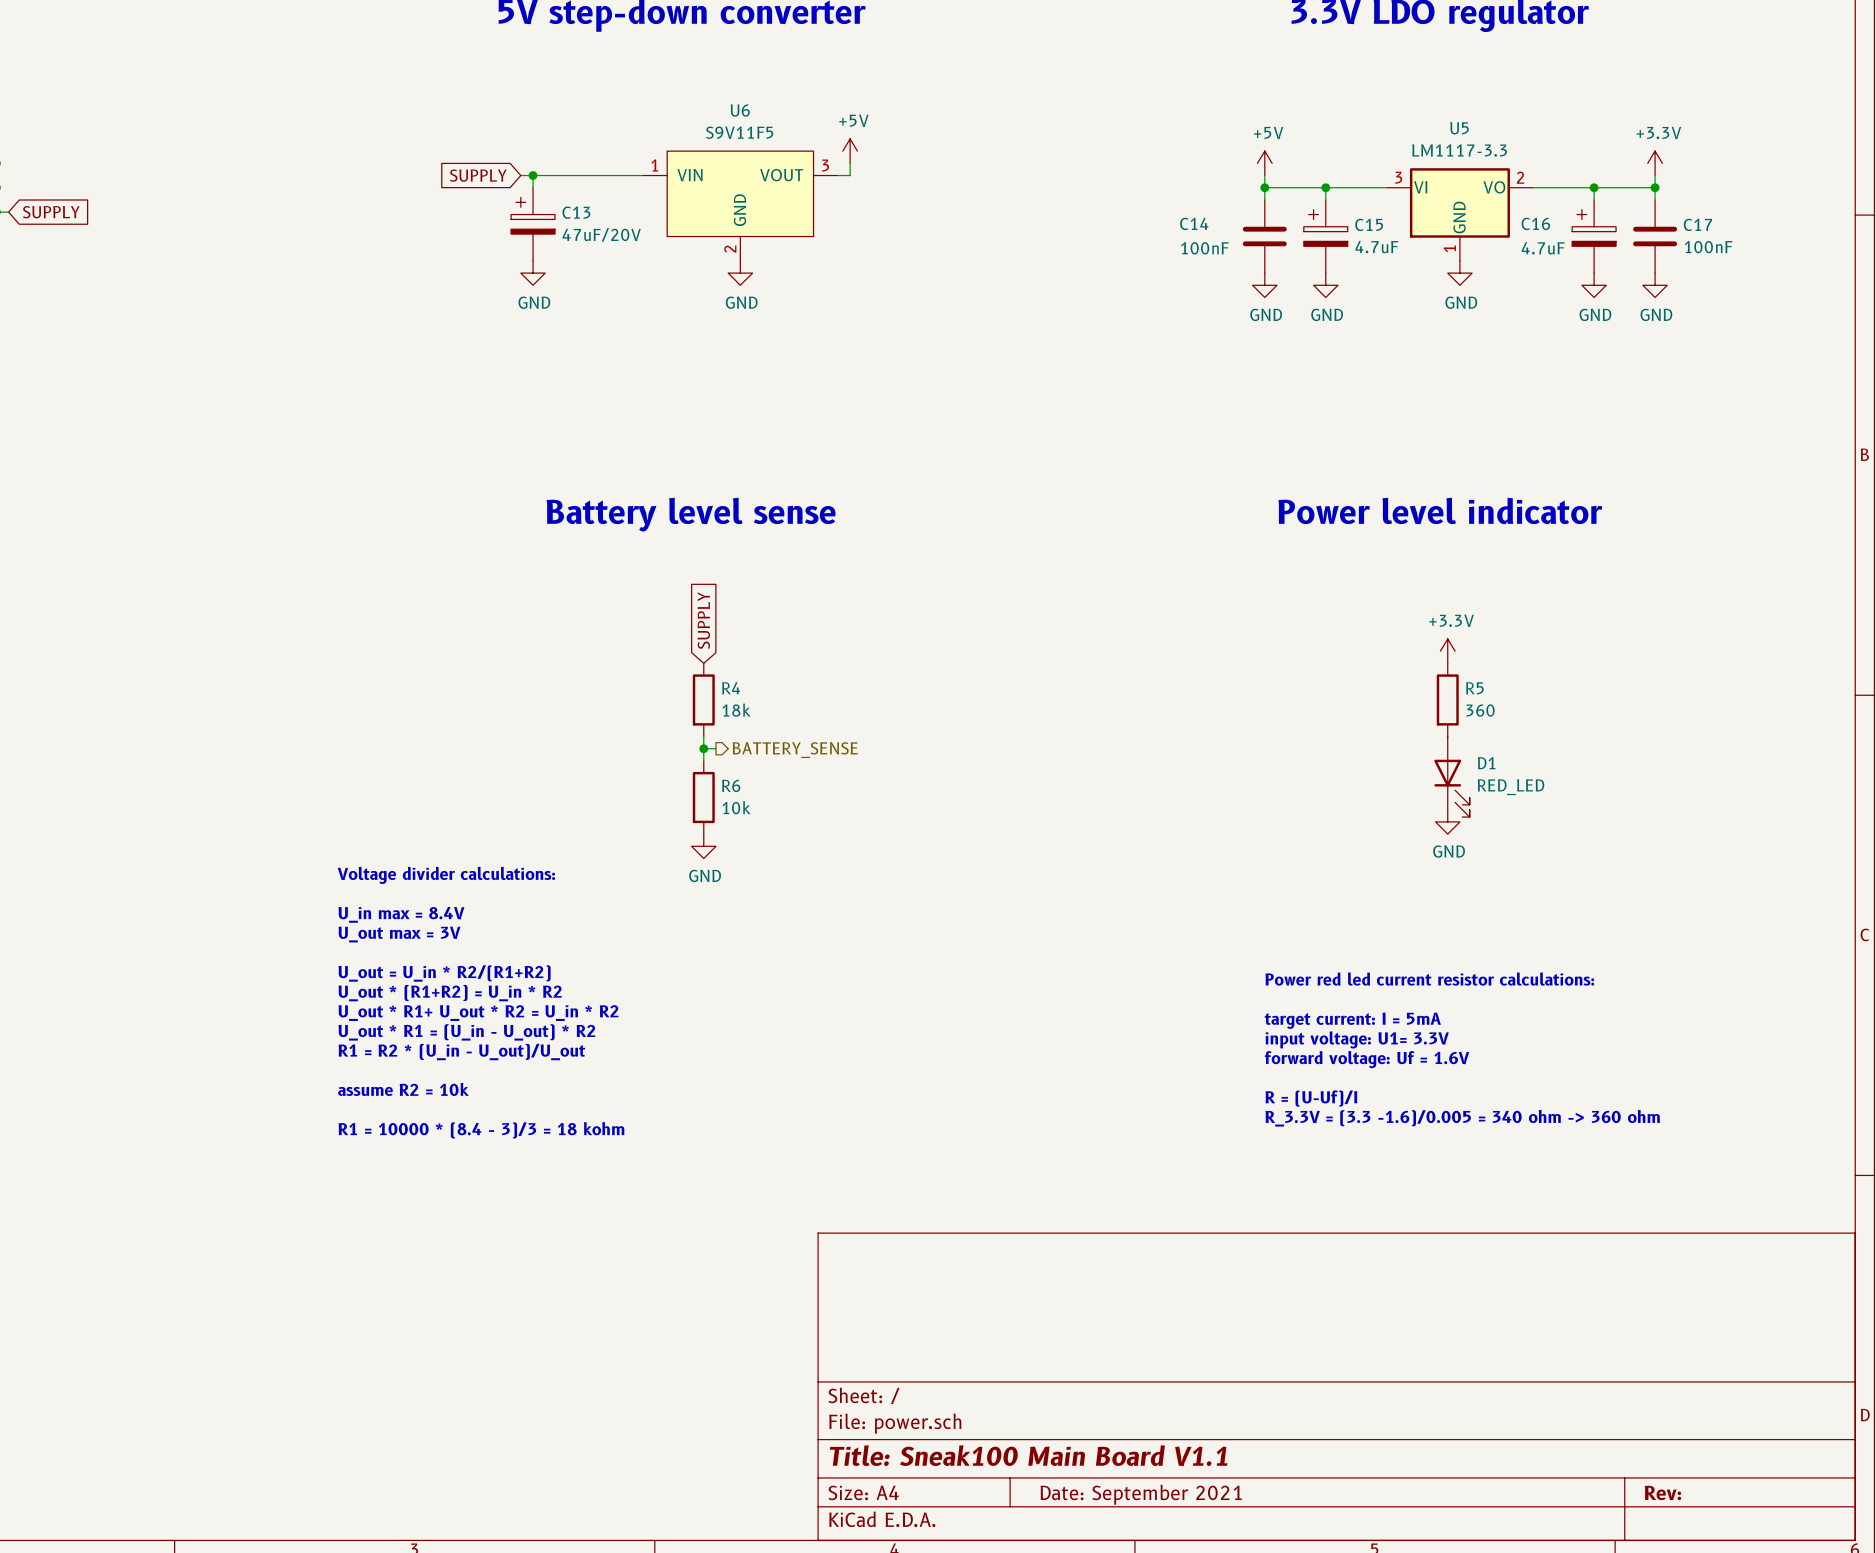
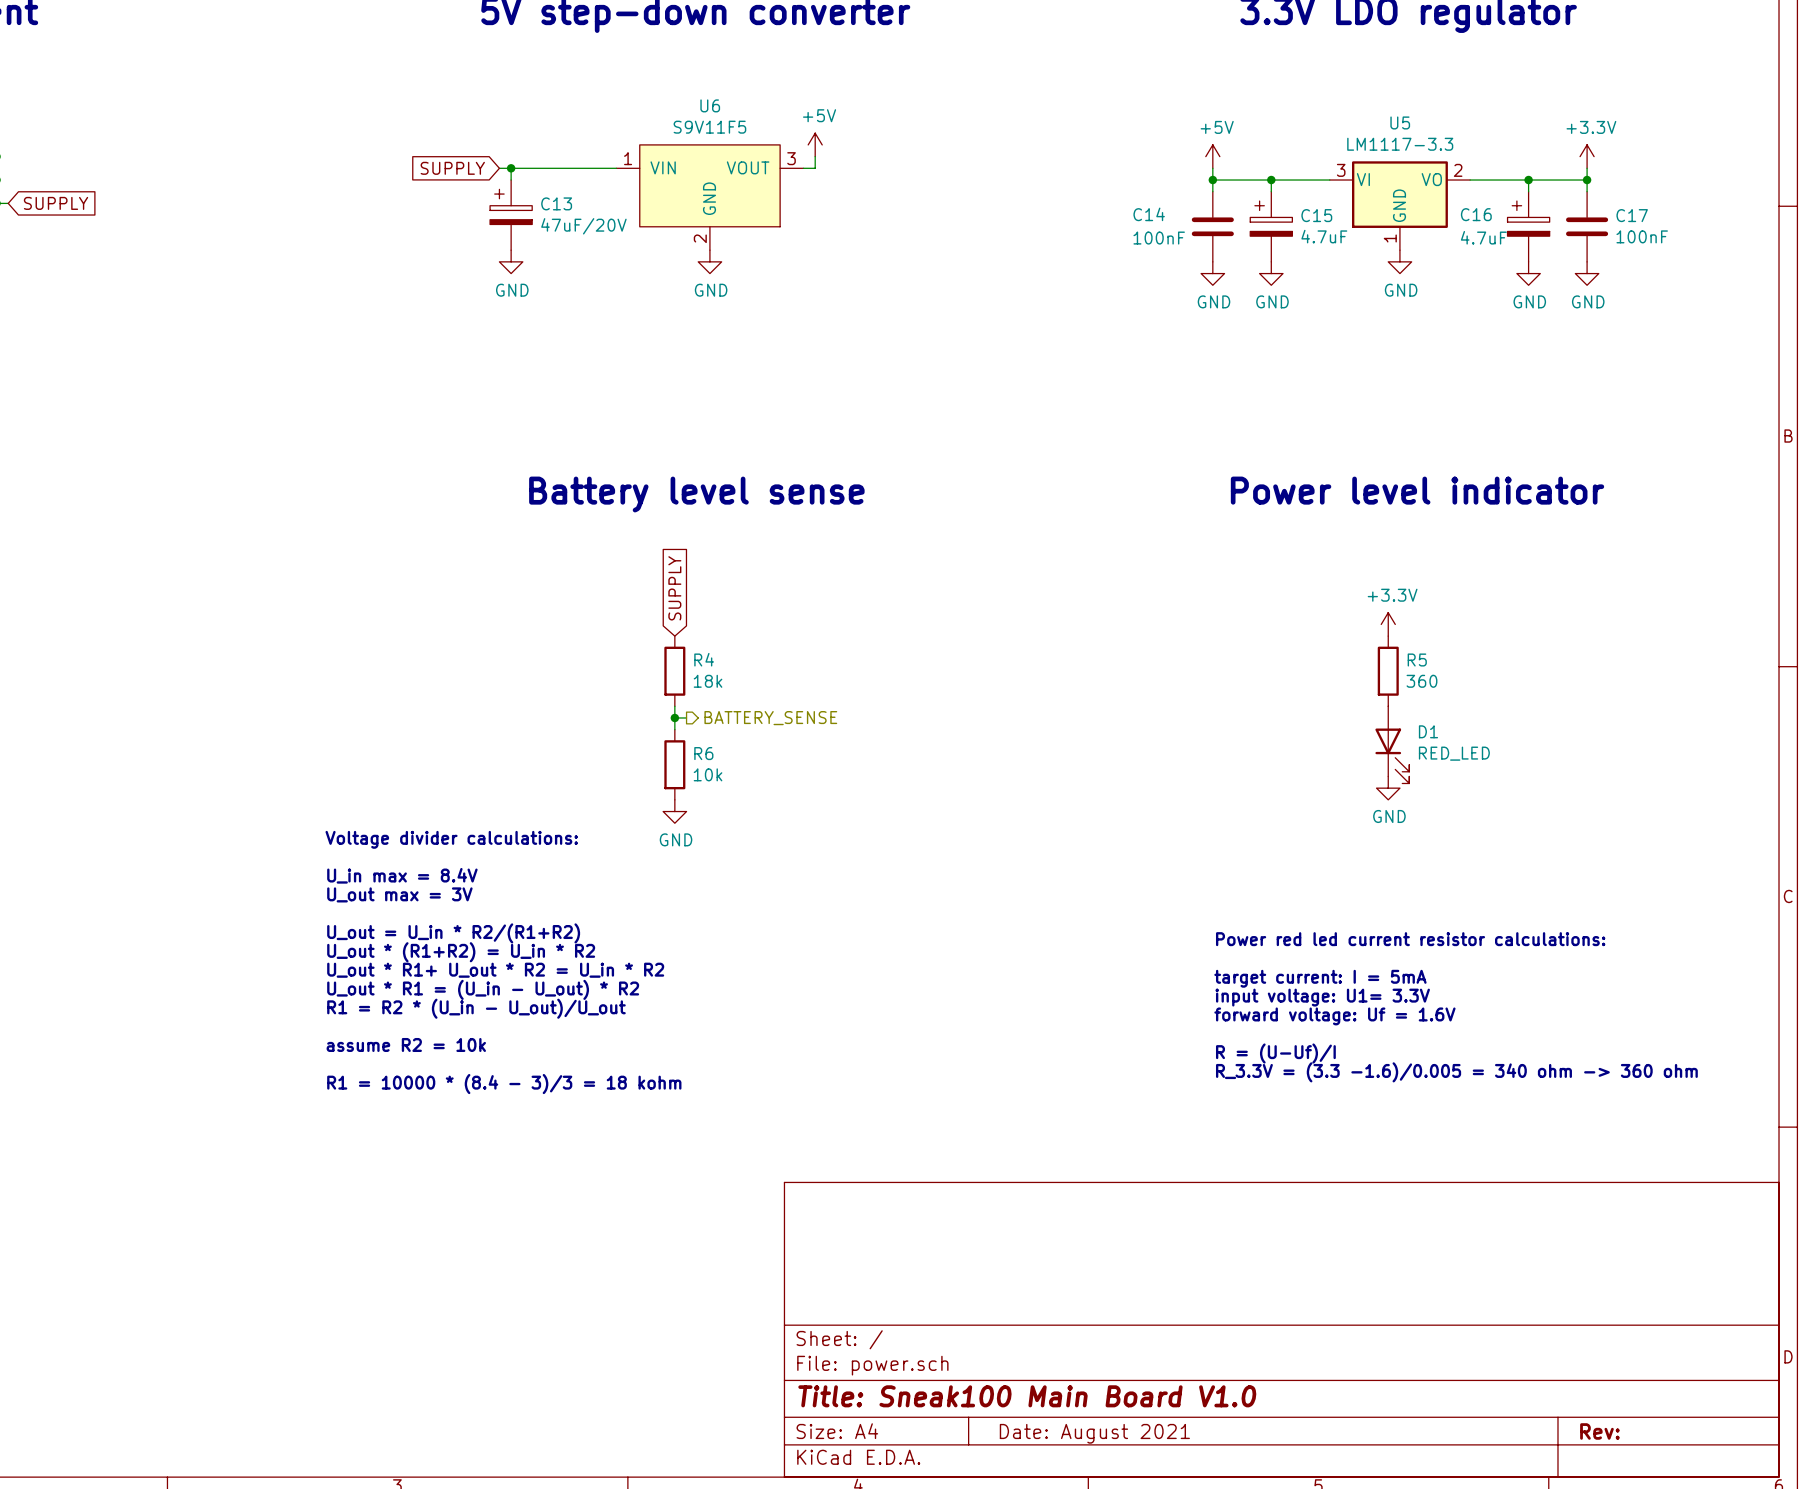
title block: Title: Sneak100 Main Board V1.1 (1028, 1455) -> Title: Sneak100 Main Board V1.0 (1027, 1396)
title block: Date: September 2021 (1141, 1494) -> Date: August 2021 (1094, 1433)

